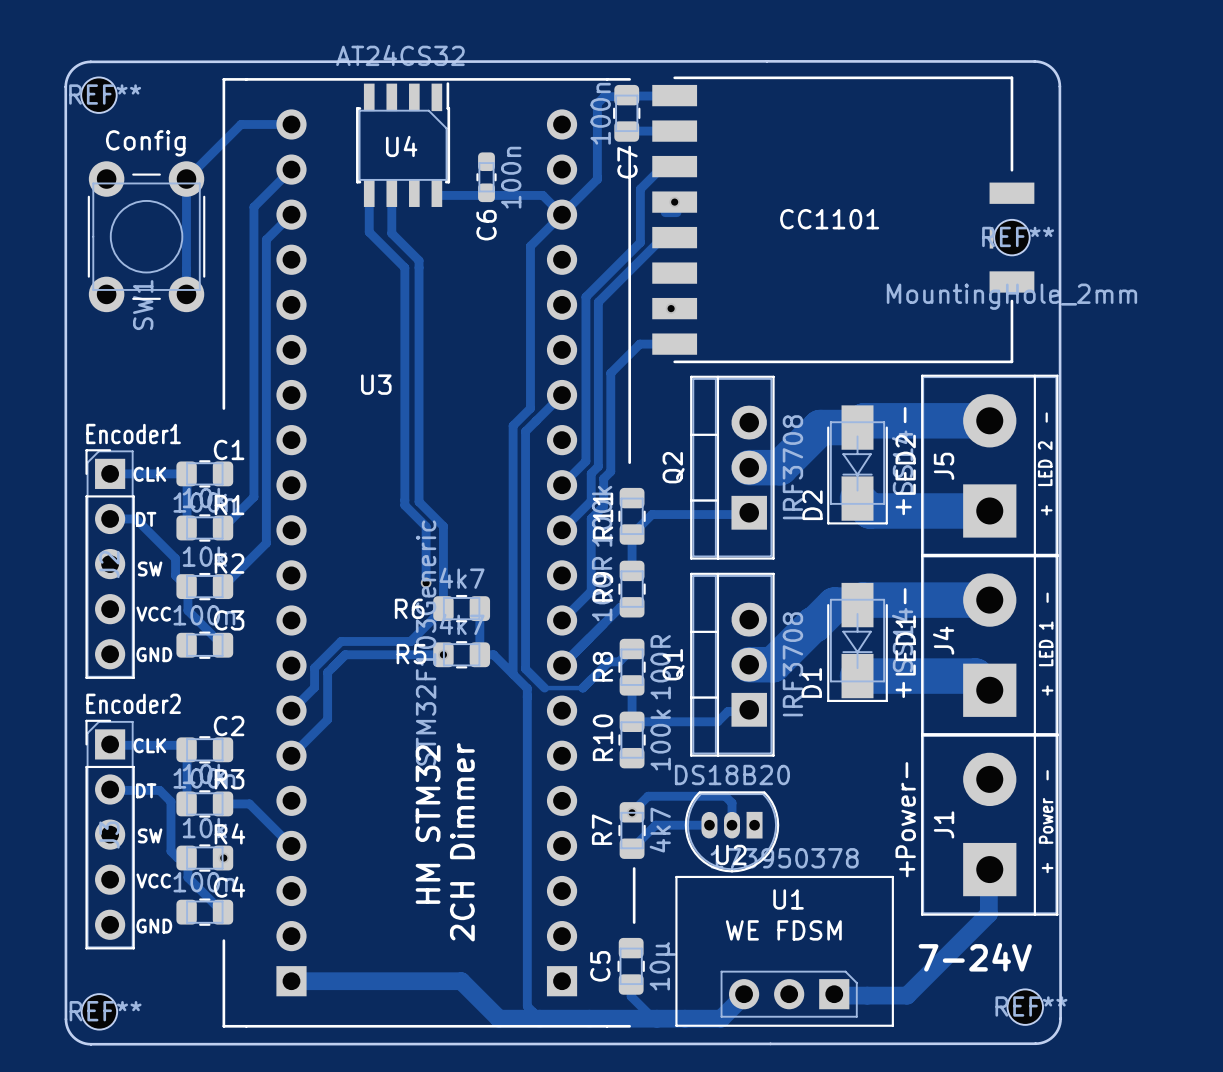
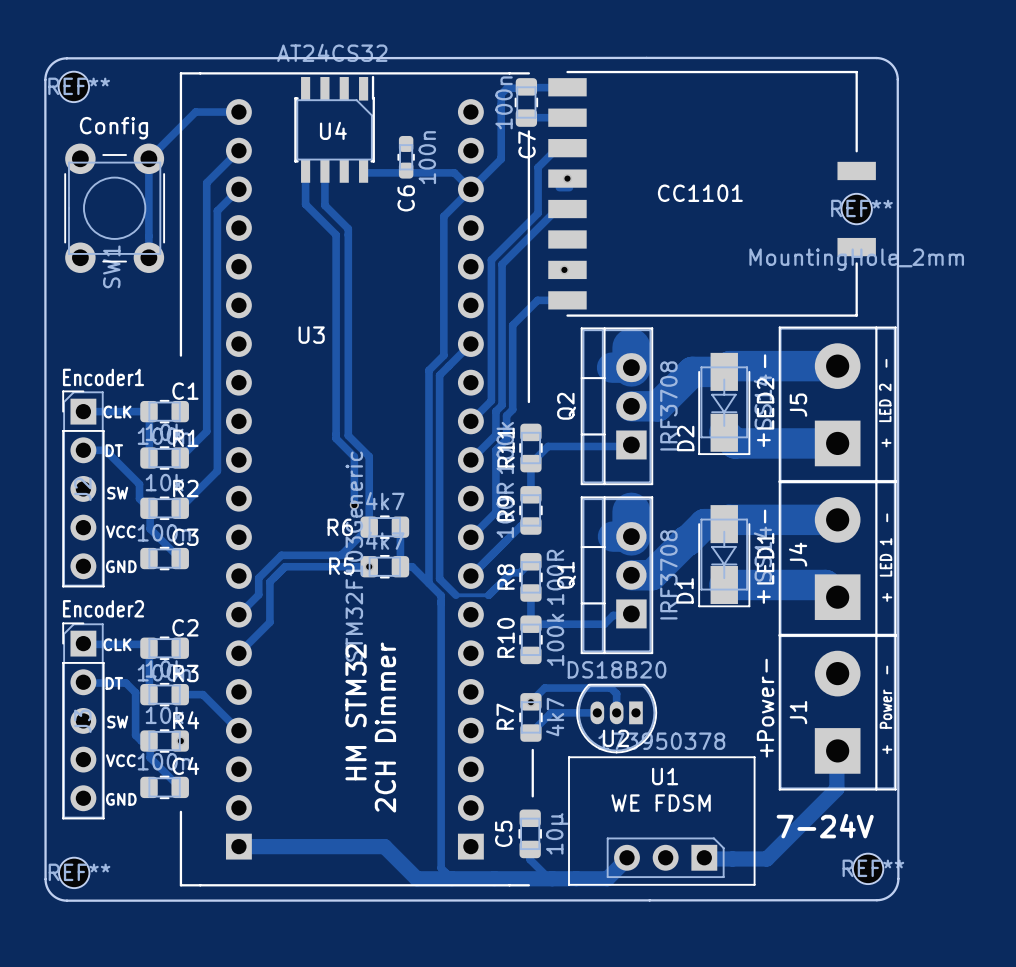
part footprint: [652, 76, 1035, 364] -> [548, 70, 876, 317]
track: none -> (631, 347) (631, 367) (612, 367)
track: none -> (631, 511) (631, 536) (612, 536)

